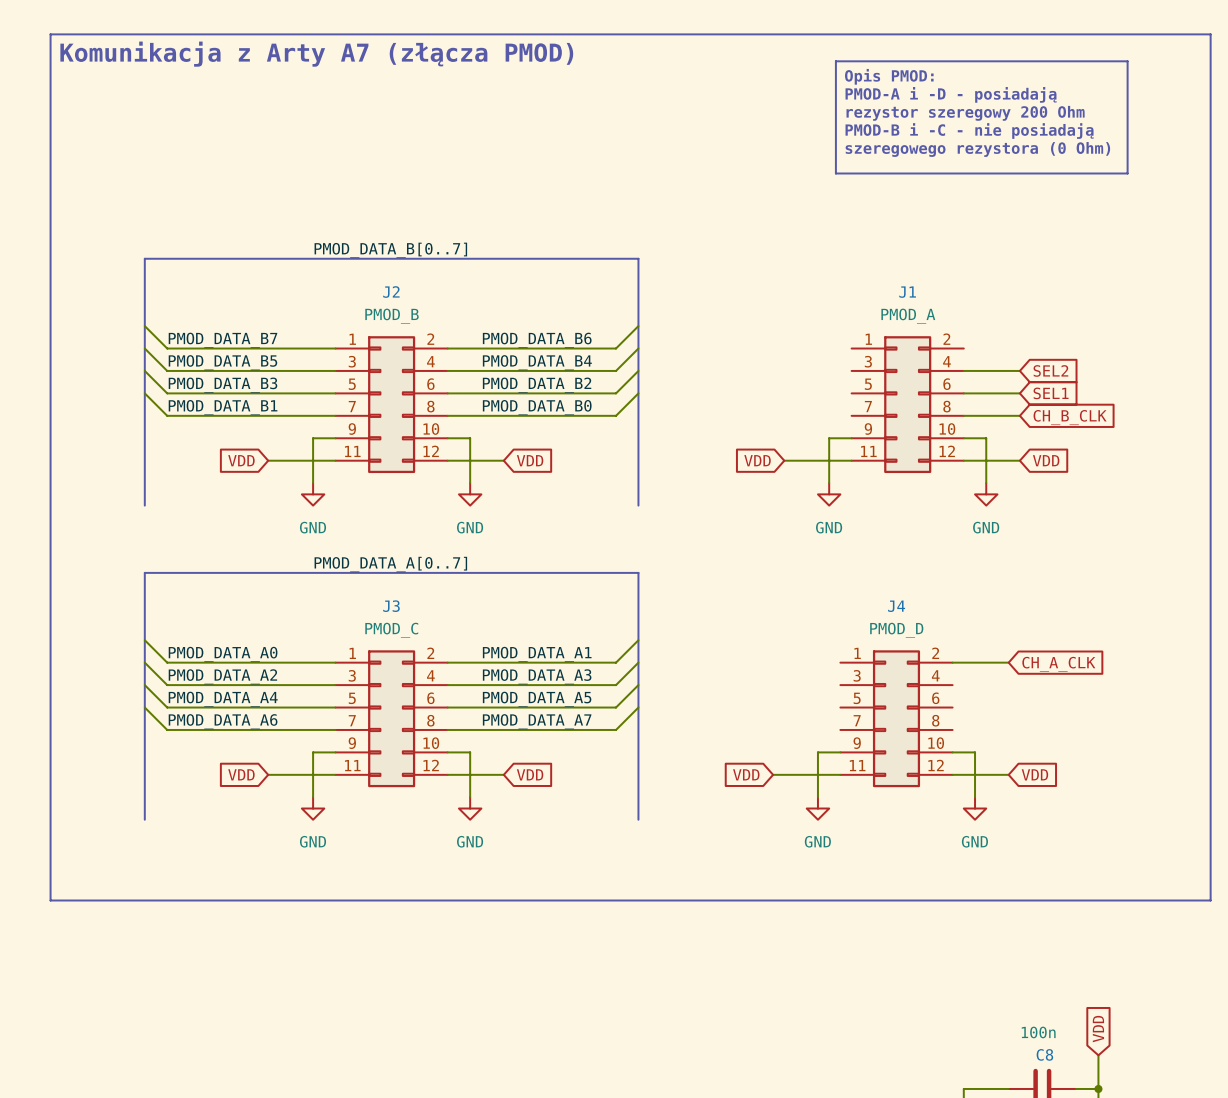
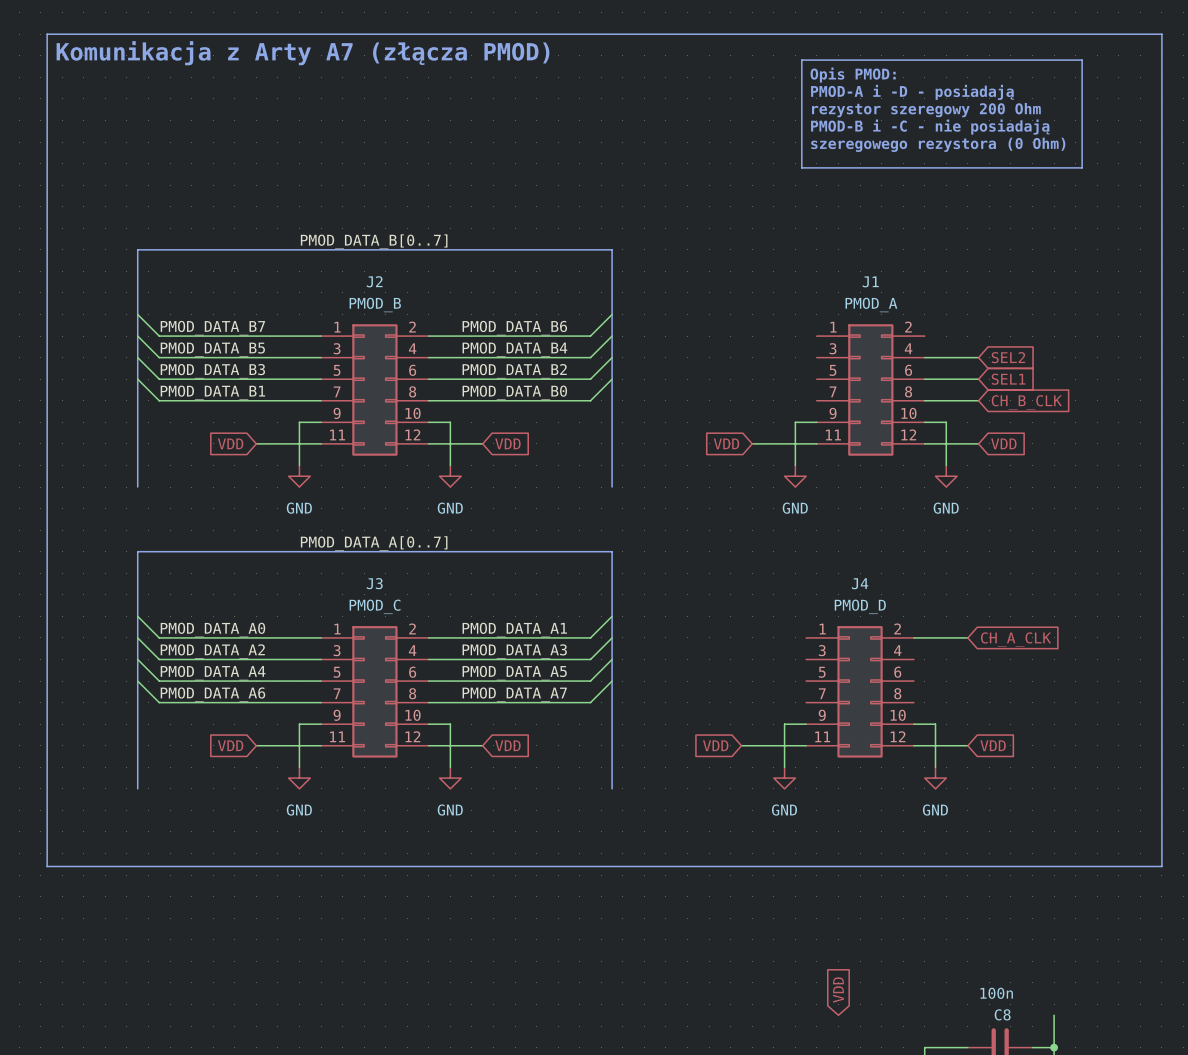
global label: none -> VDD (838, 990)
global label: VDD (1098, 1029) -> none

